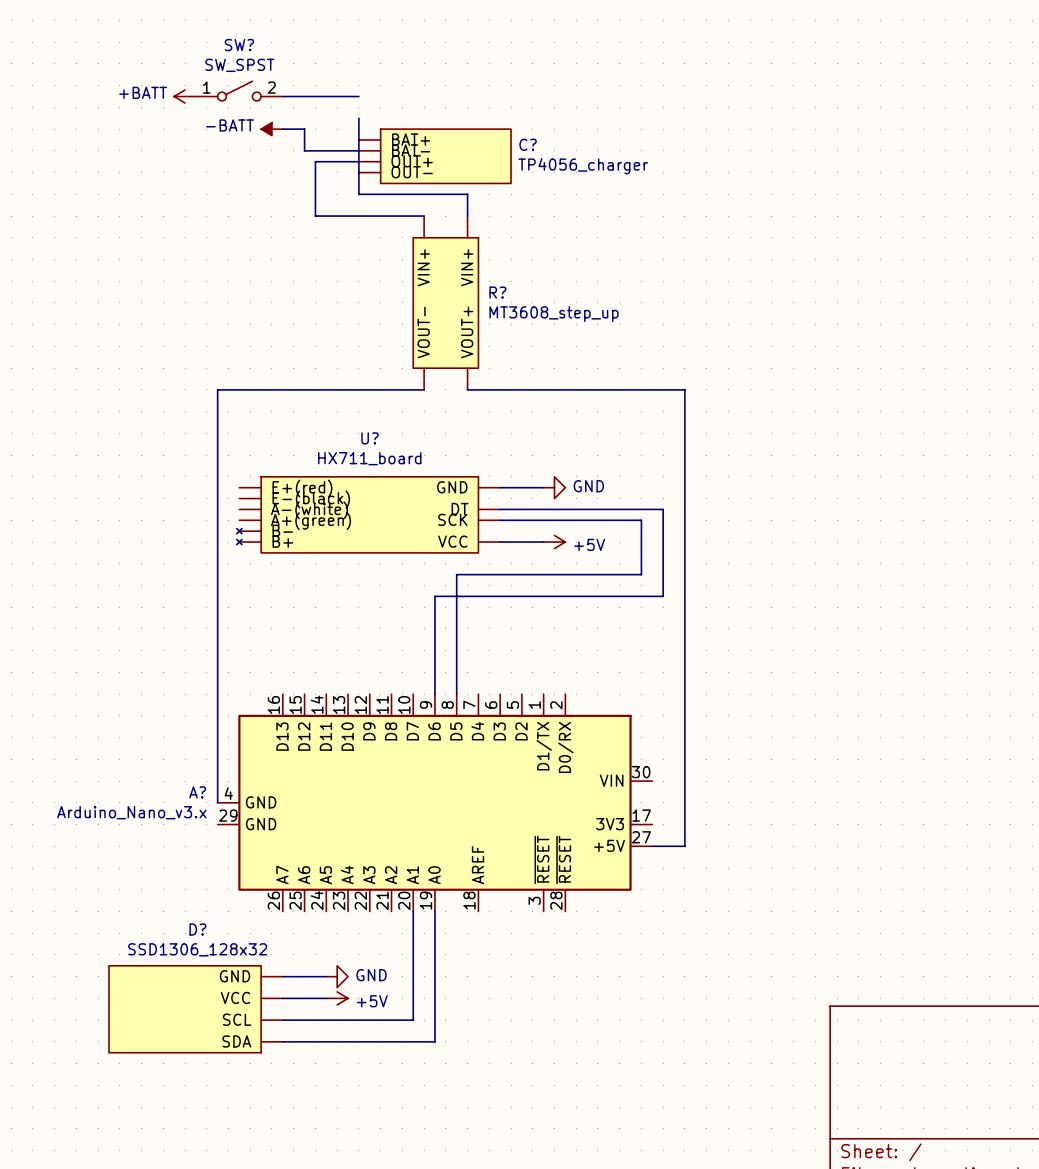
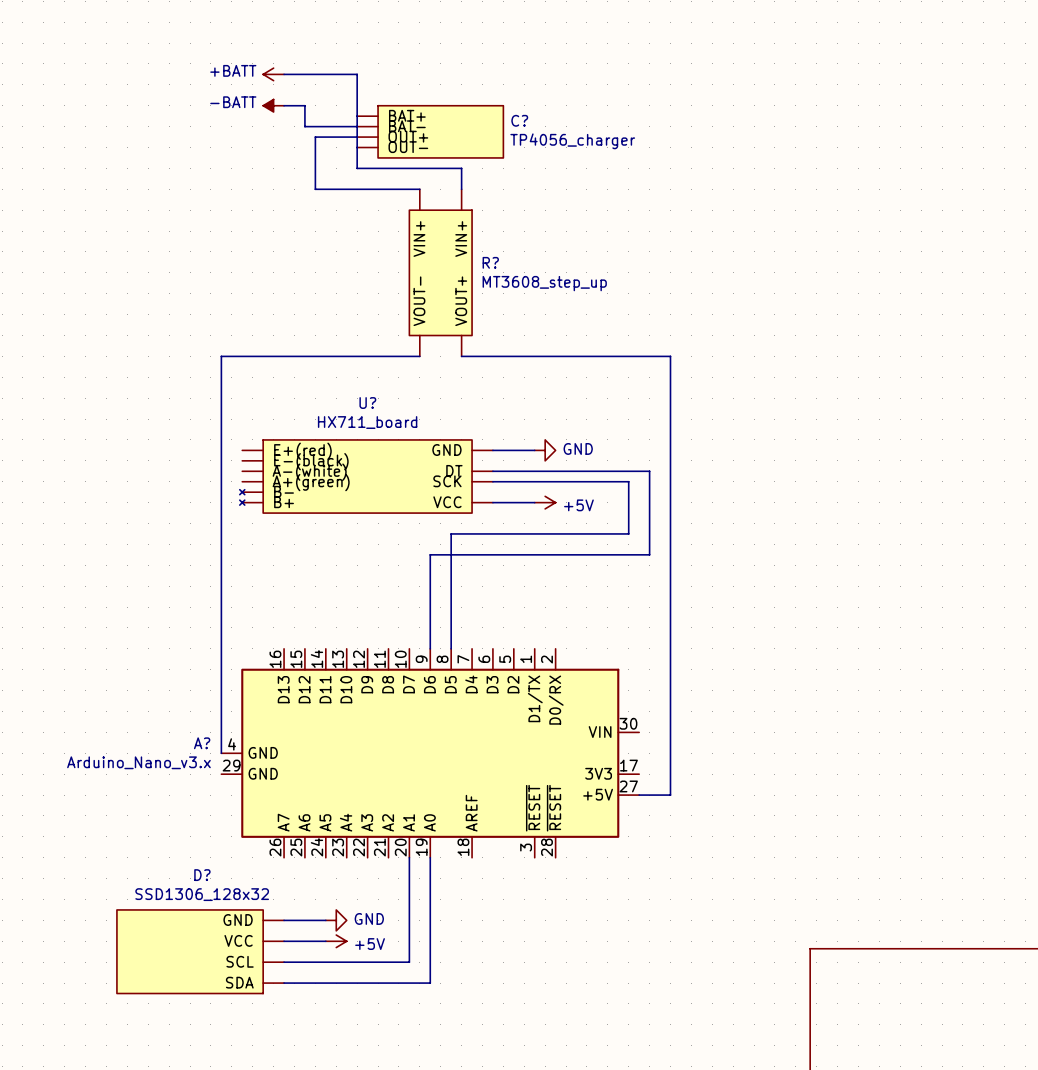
SW?: SW_SPST (239, 91) -> none
power symbol position: +BATT (185, 96) -> +BATT (273, 74)
wire: none -> (357, 74) (357, 95)

